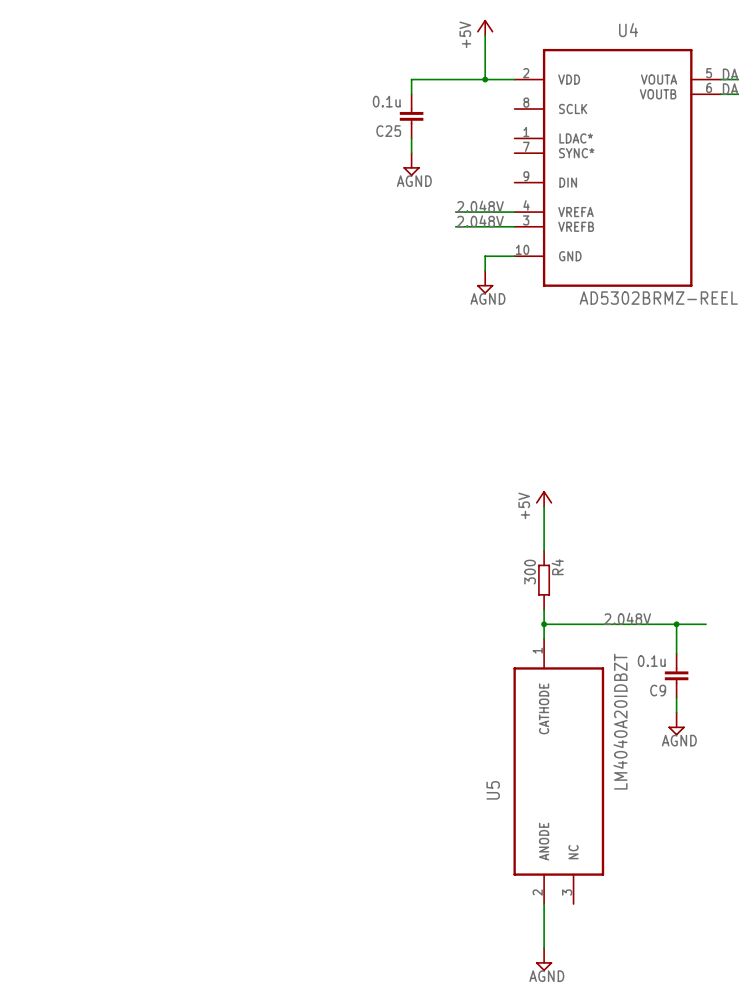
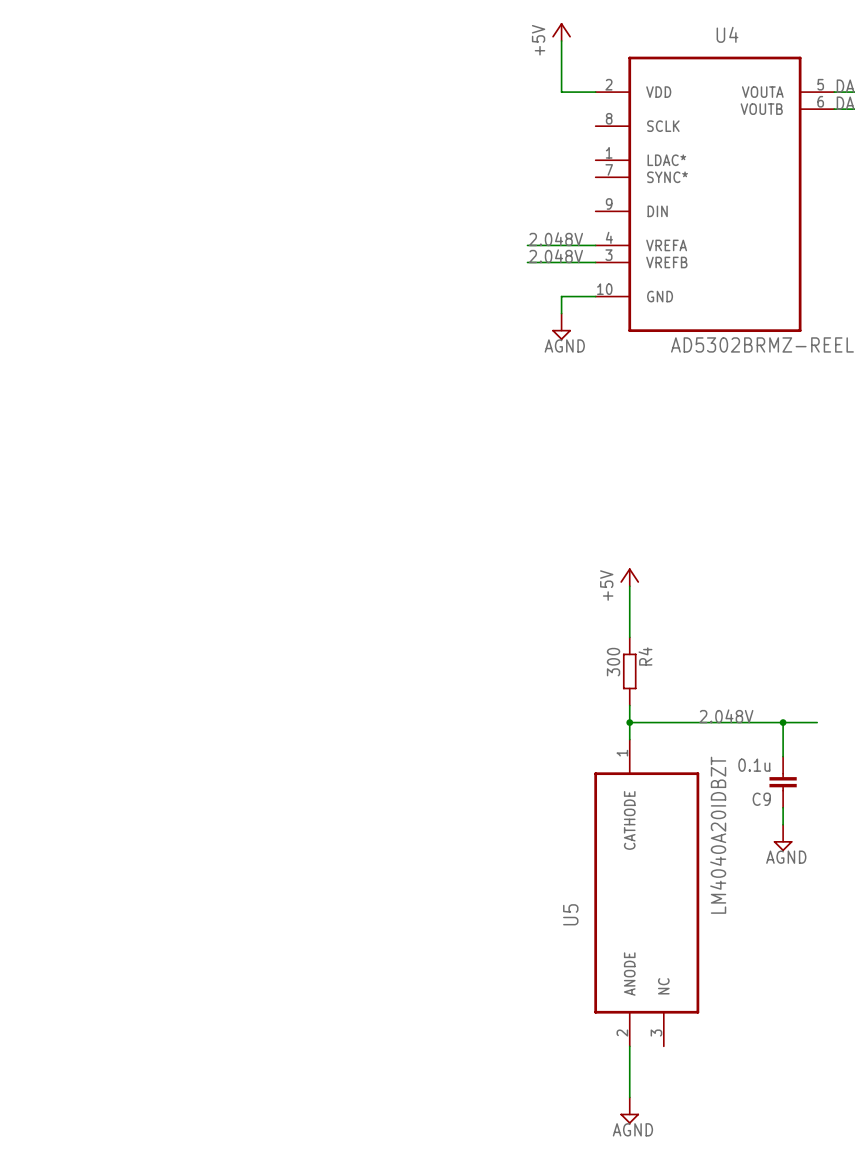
wire: (485, 79) (411, 79) (411, 94) -> none
junction: (485, 79) -> none
C25: 0.1u (411, 116) -> none
wire: (411, 138) (411, 153) -> none
power symbol: AGND (411, 164) -> none

